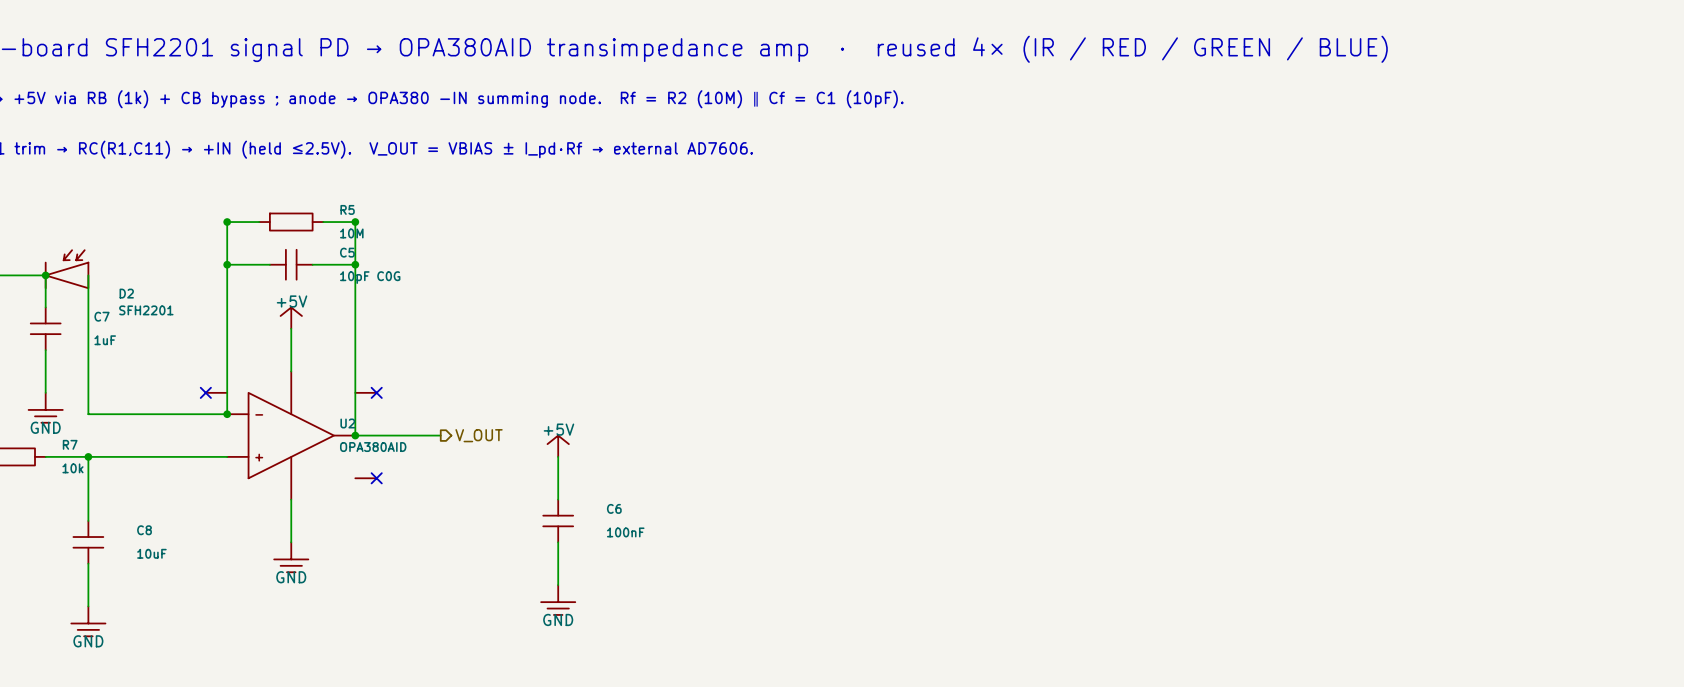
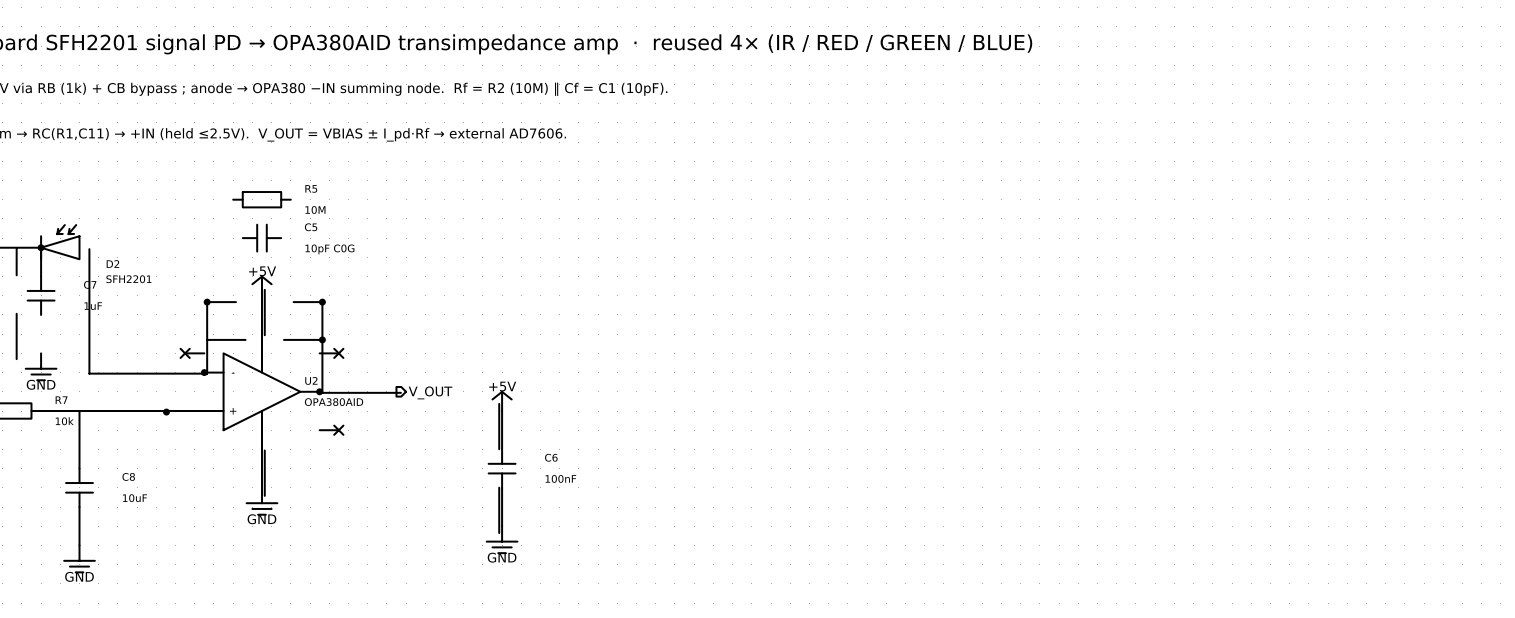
junction: (227, 222) -> none
wire: (259, 222) (227, 222) (227, 414) (88, 414) (88, 275) -> none
wire: (323, 222) (355, 222) (355, 435) (440, 435) -> none
junction: (355, 222) -> none
wire: (227, 264) (269, 264) -> (207, 339) (245, 339)
junction: (227, 264) -> none
wire: (312, 264) (355, 264) -> (283, 339) (322, 339)
junction: (355, 264) -> none
wire: none -> (16, 249) (16, 275)
wire: none -> (89, 249) (89, 373) (207, 373) (207, 302) (235, 302)
wire: none -> (264, 289) (264, 335)
junction: none -> (207, 302)
wire: none -> (293, 302) (322, 302) (322, 392) (400, 392)
junction: none -> (322, 302)
wire: none -> (16, 313) (16, 359)
wire: (45, 350) (45, 392) -> none
junction: none -> (322, 339)
wire: none -> (499, 403) (499, 449)
junction: (88, 456) -> none
junction: none -> (166, 412)
wire: none -> (264, 450) (264, 495)
wire: none -> (499, 487) (499, 533)

